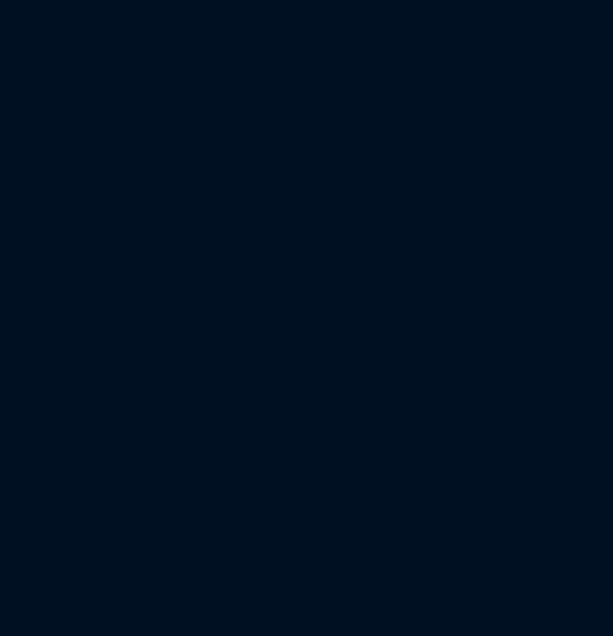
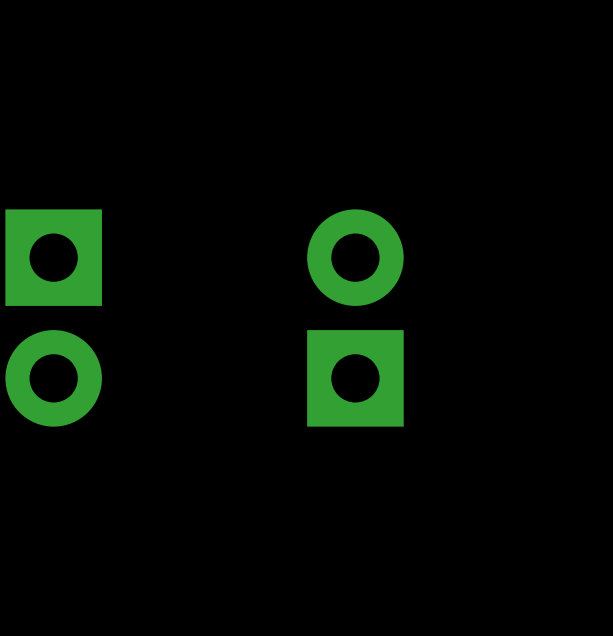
part: none -> (53, 318)
part: none -> (355, 318)

